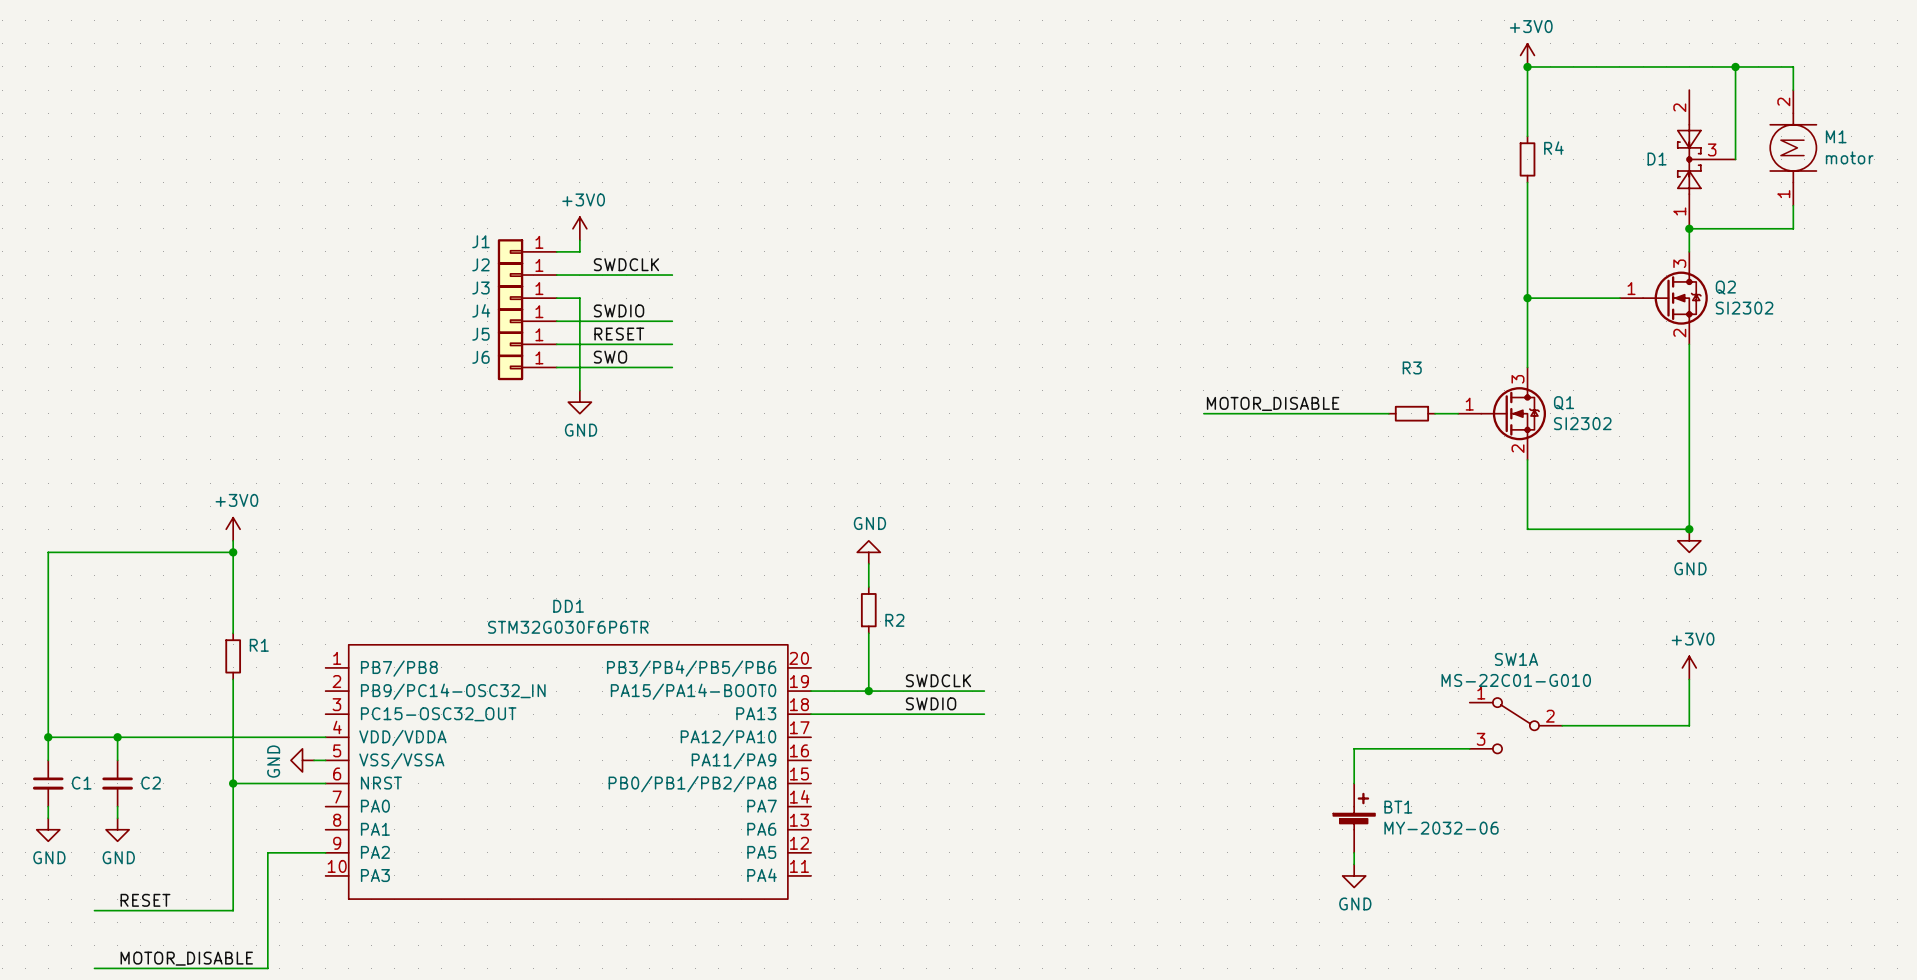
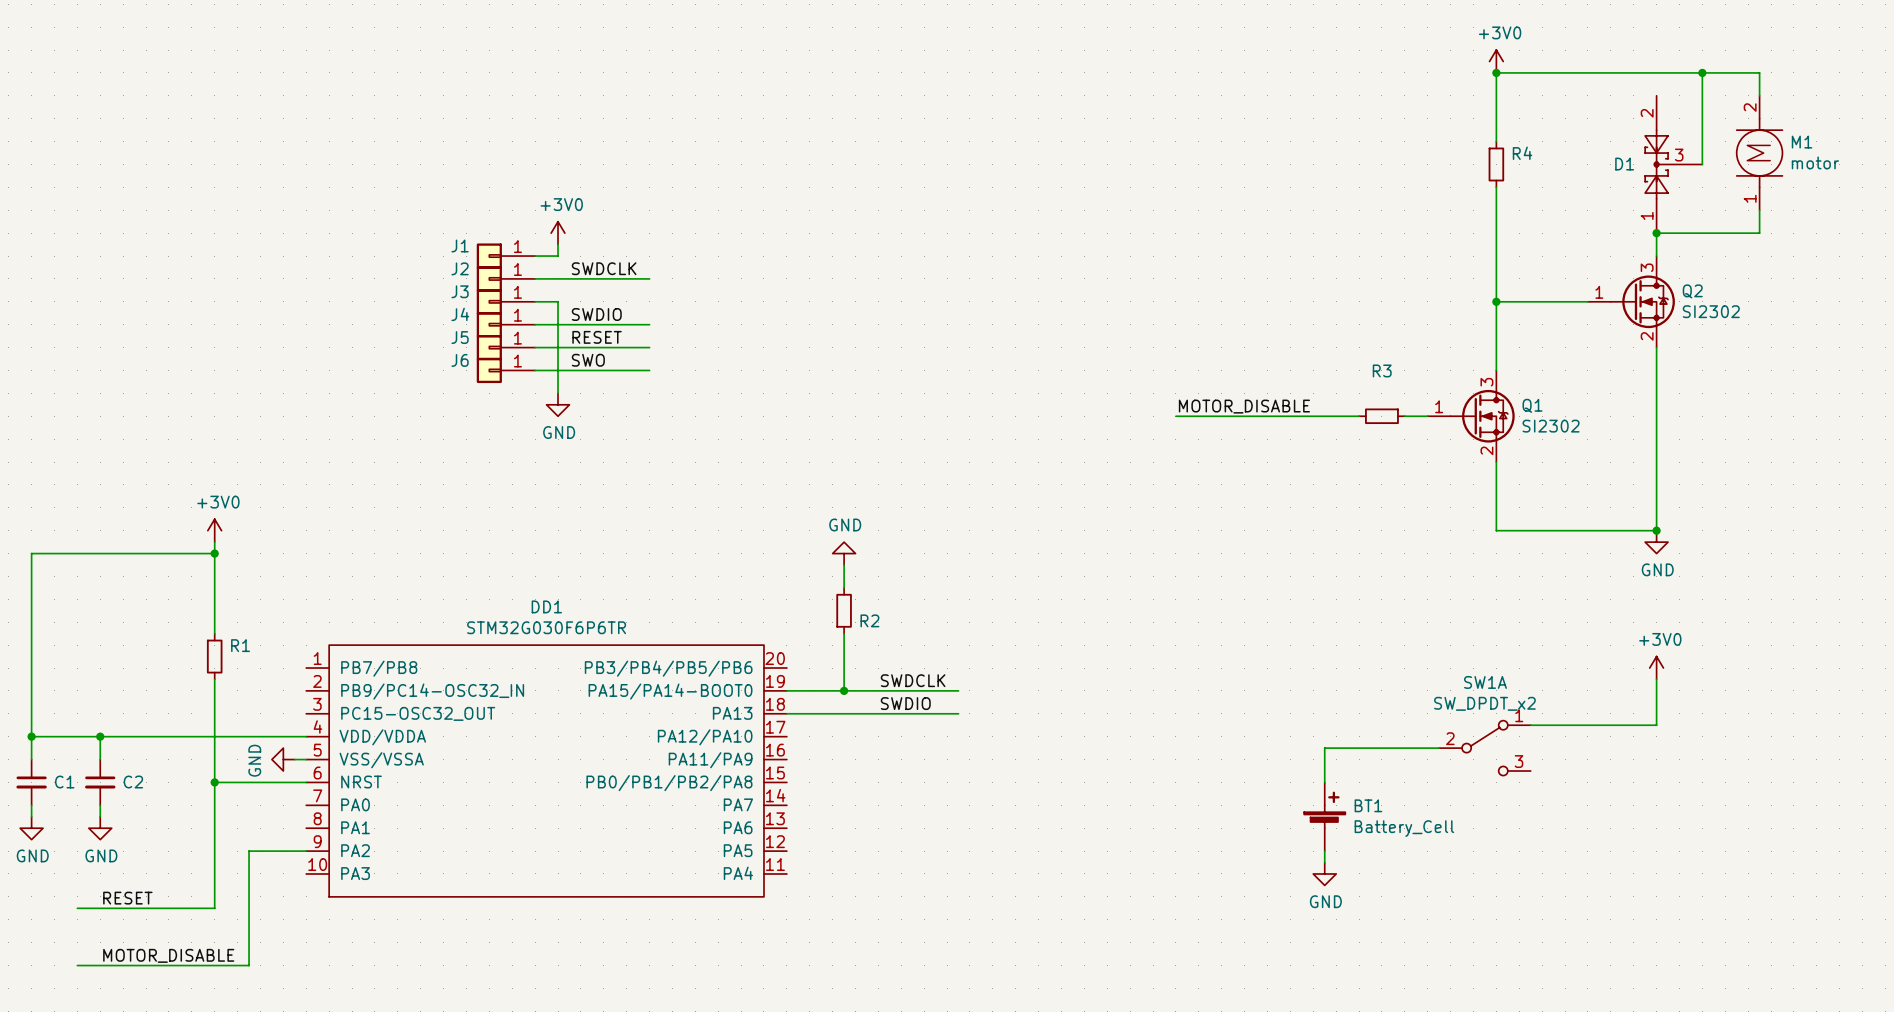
SW1A value: MS-22C01-G010 (1516, 680) -> SW_DPDT_x2 (1484, 703)
SW1A flip: as is (1515, 725) -> left-right (1484, 748)
BT1 value: MY-2032-06 (1441, 828) -> Battery_Cell (1404, 828)

